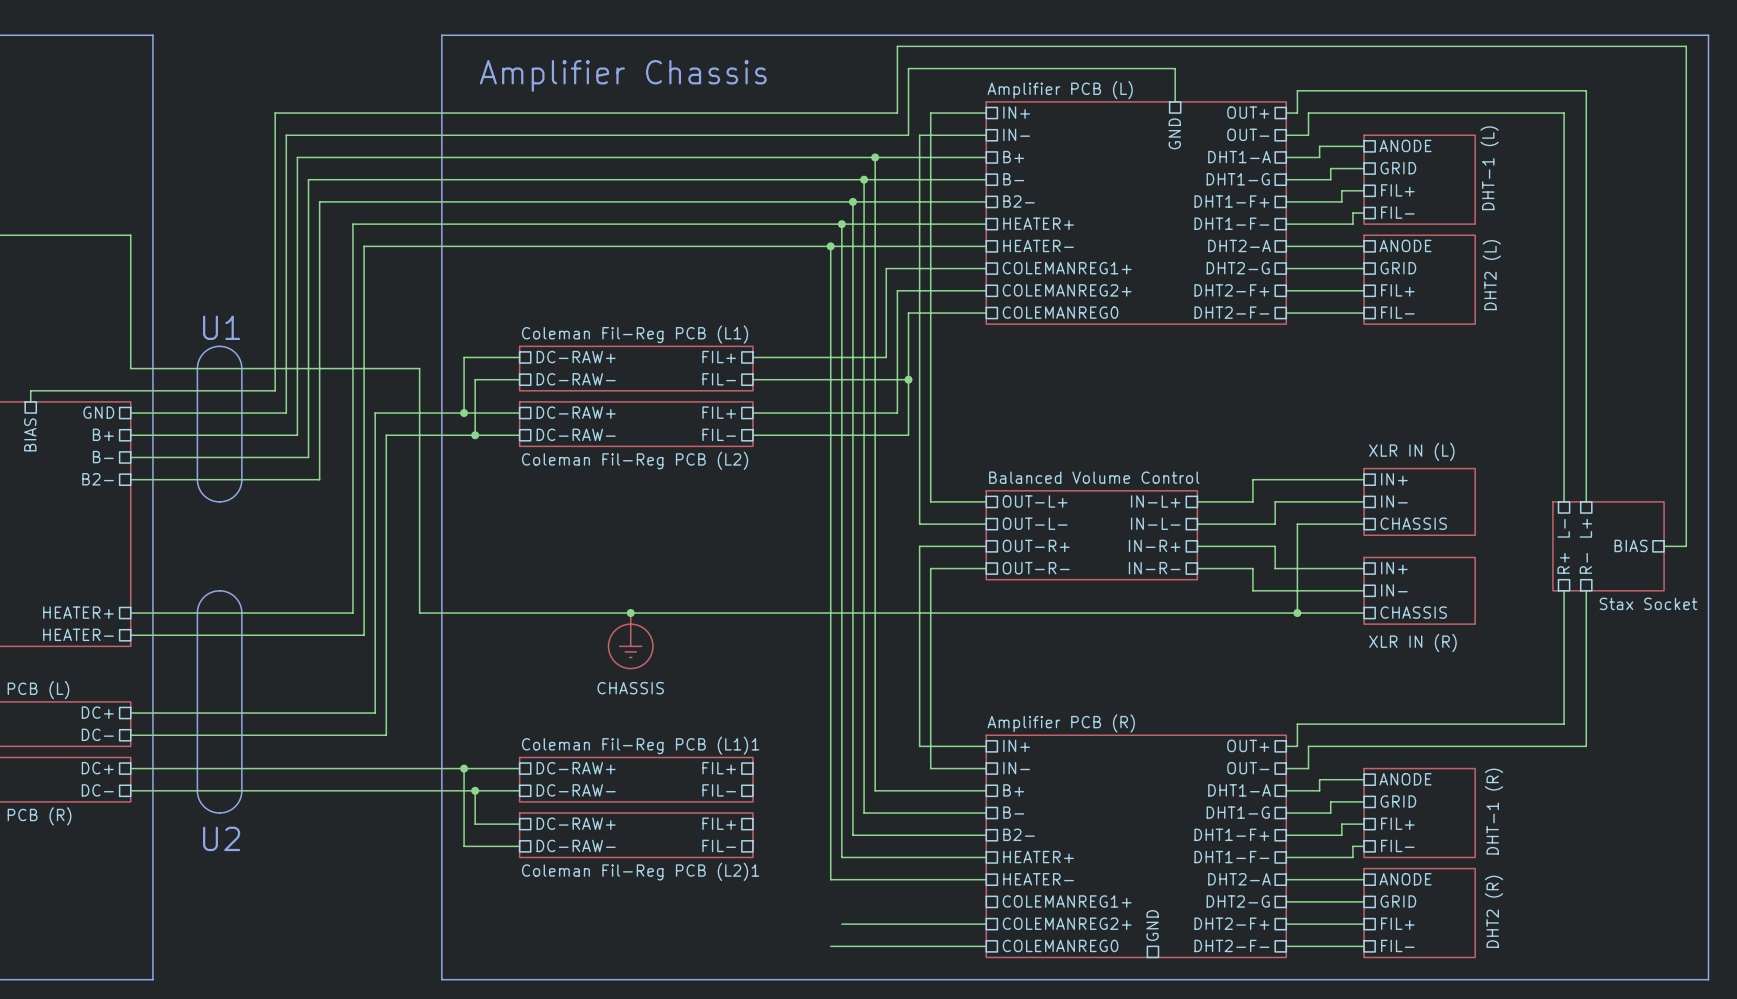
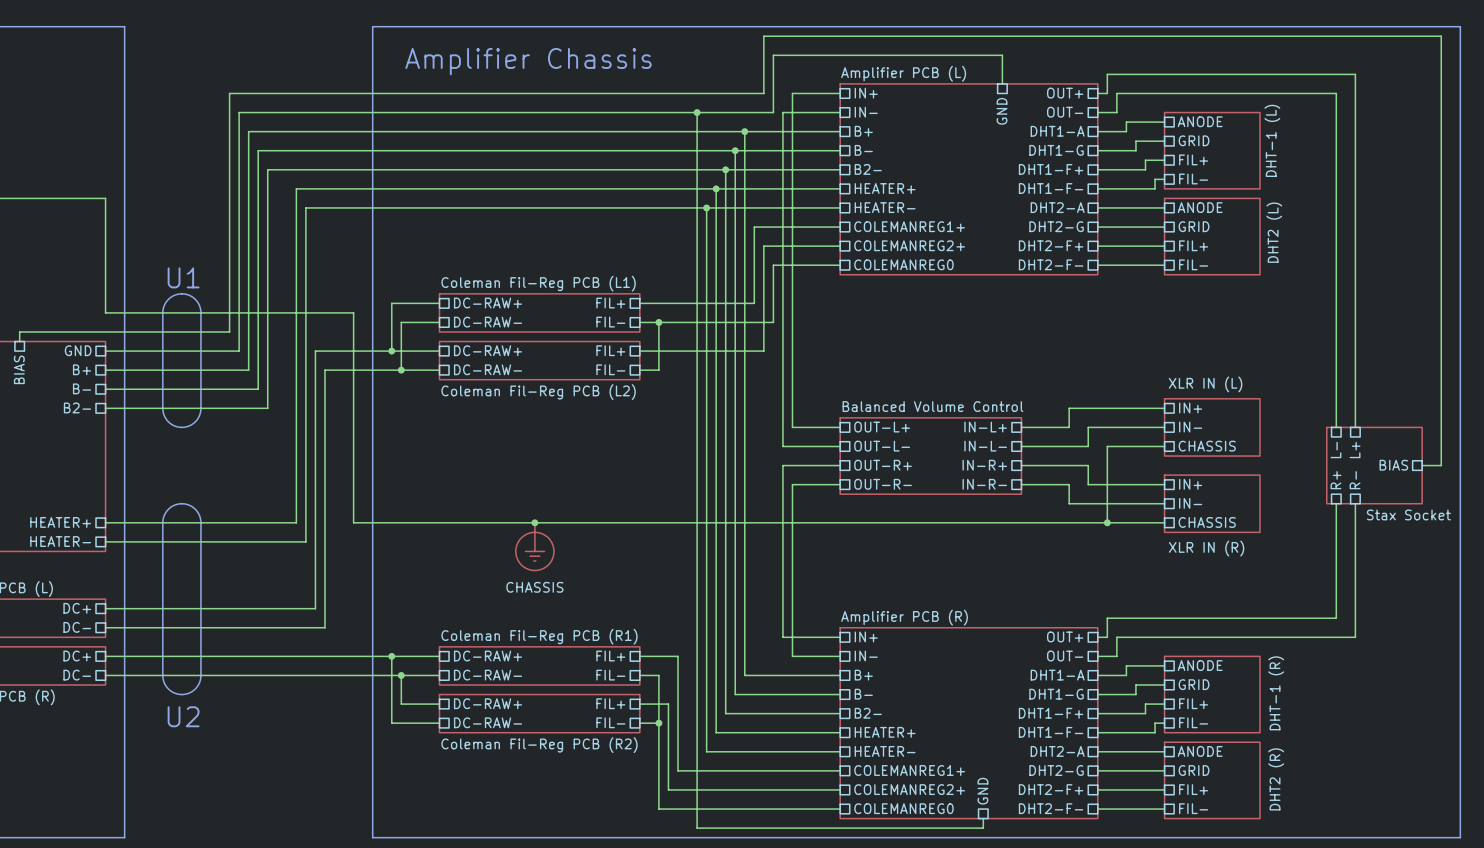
wire: none -> (697, 112) (697, 828) (983, 828) (983, 818)
junction: none -> (697, 112)
junction: none -> (658, 322)
wire: (908, 379) (908, 435) (775, 435) -> (658, 322) (658, 370)
junction: (908, 379) -> none
sheet Coleman Fil-Reg PCB (L1)1 name: Coleman Fil-Reg PCB (L1)1 (640, 745) -> Coleman Fil-Reg PCB (R1) (539, 636)
wire: none -> (639, 656) (678, 656) (678, 770) (840, 770)
wire: none -> (639, 675) (658, 675) (658, 809) (706, 809)
wire: none -> (639, 704) (668, 704) (668, 789) (716, 789)
wire: none -> (639, 723) (658, 723)
junction: none -> (658, 723)
sheet Coleman Fil-Reg PCB (L2)1 name: Coleman Fil-Reg PCB (L2)1 (640, 871) -> Coleman Fil-Reg PCB (R2) (539, 745)

